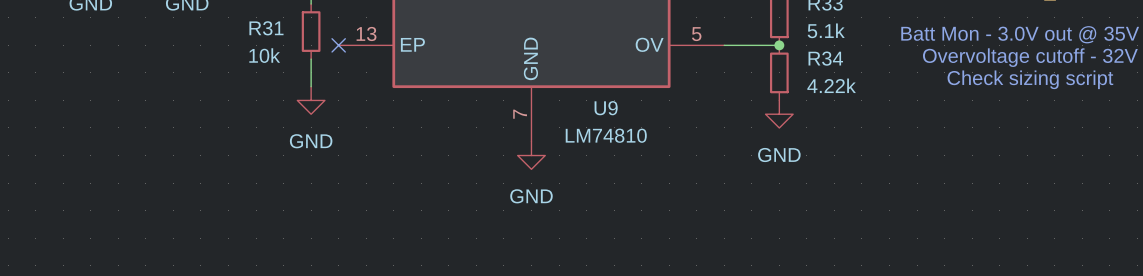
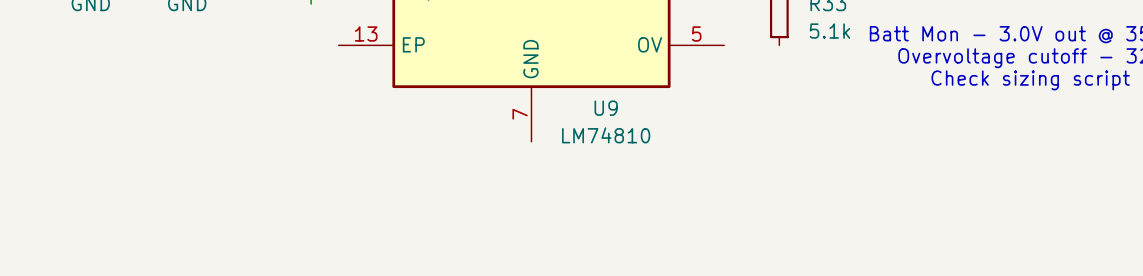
R31: 10k (311, 31) -> none
no-connect mark: (338, 45) -> none
wire: (724, 45) (779, 45) -> none
junction: (779, 45) -> none
wire: (311, 59) (311, 86) -> none
R34: 4.22k (779, 72) -> none
power symbol: GND (311, 100) -> none
power symbol: GND (779, 114) -> none
power symbol: GND (531, 155) -> none

